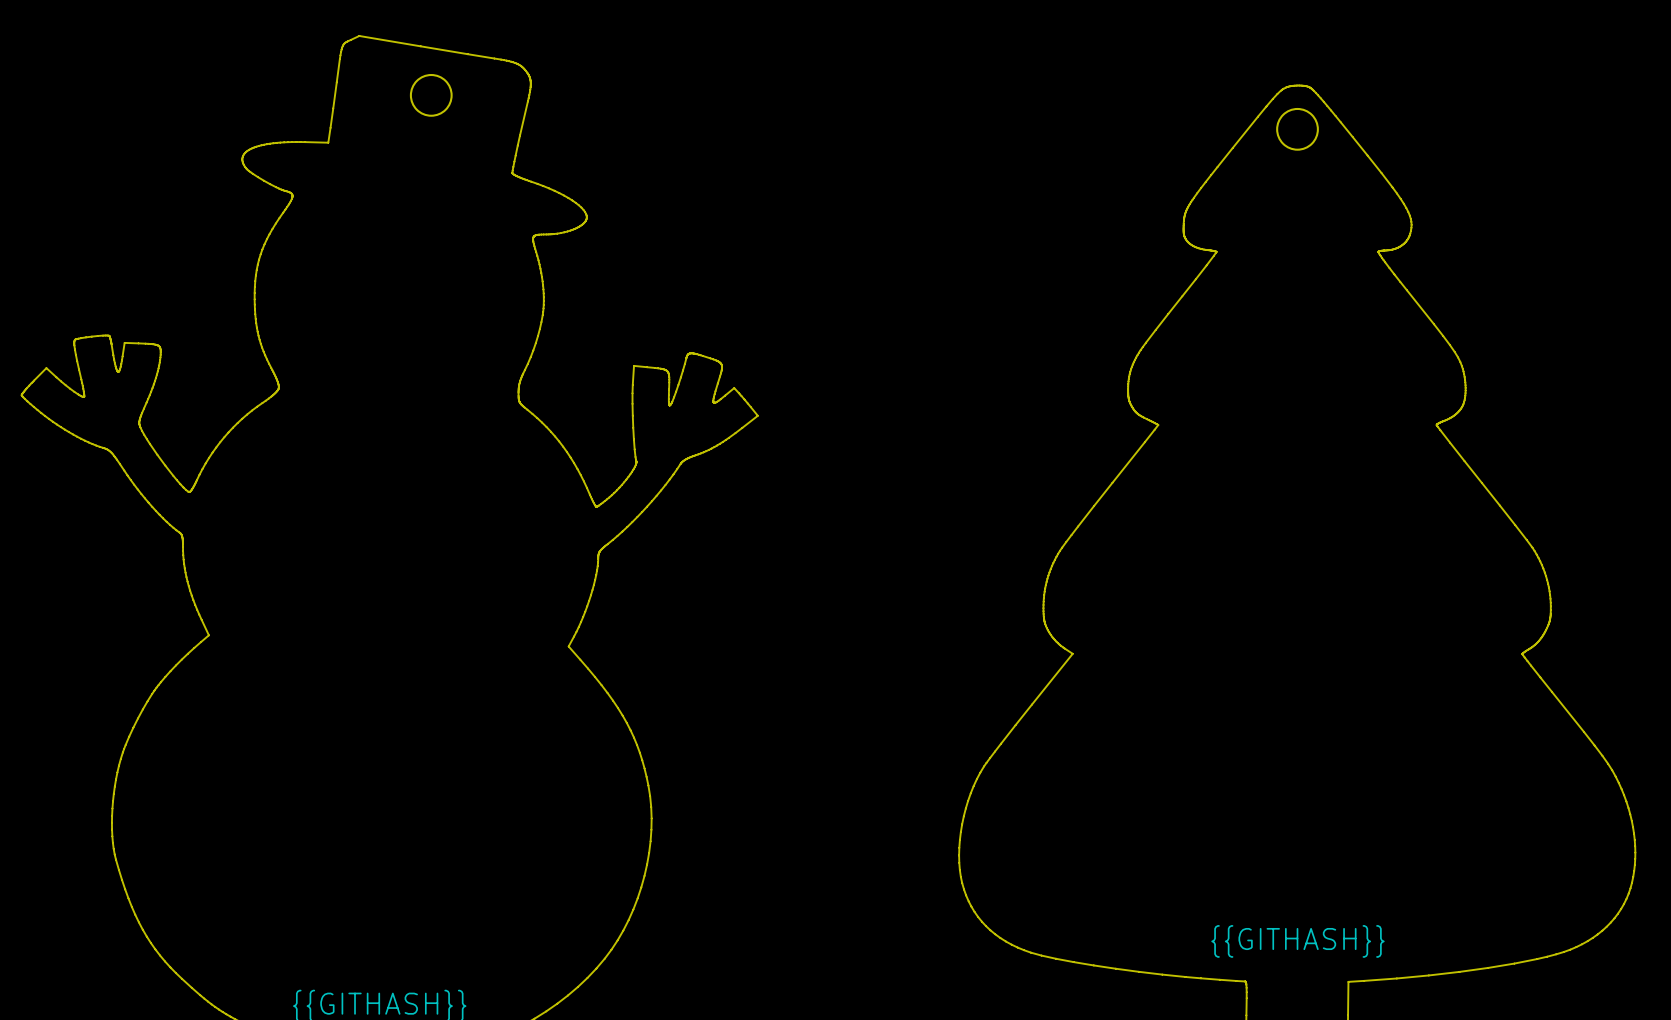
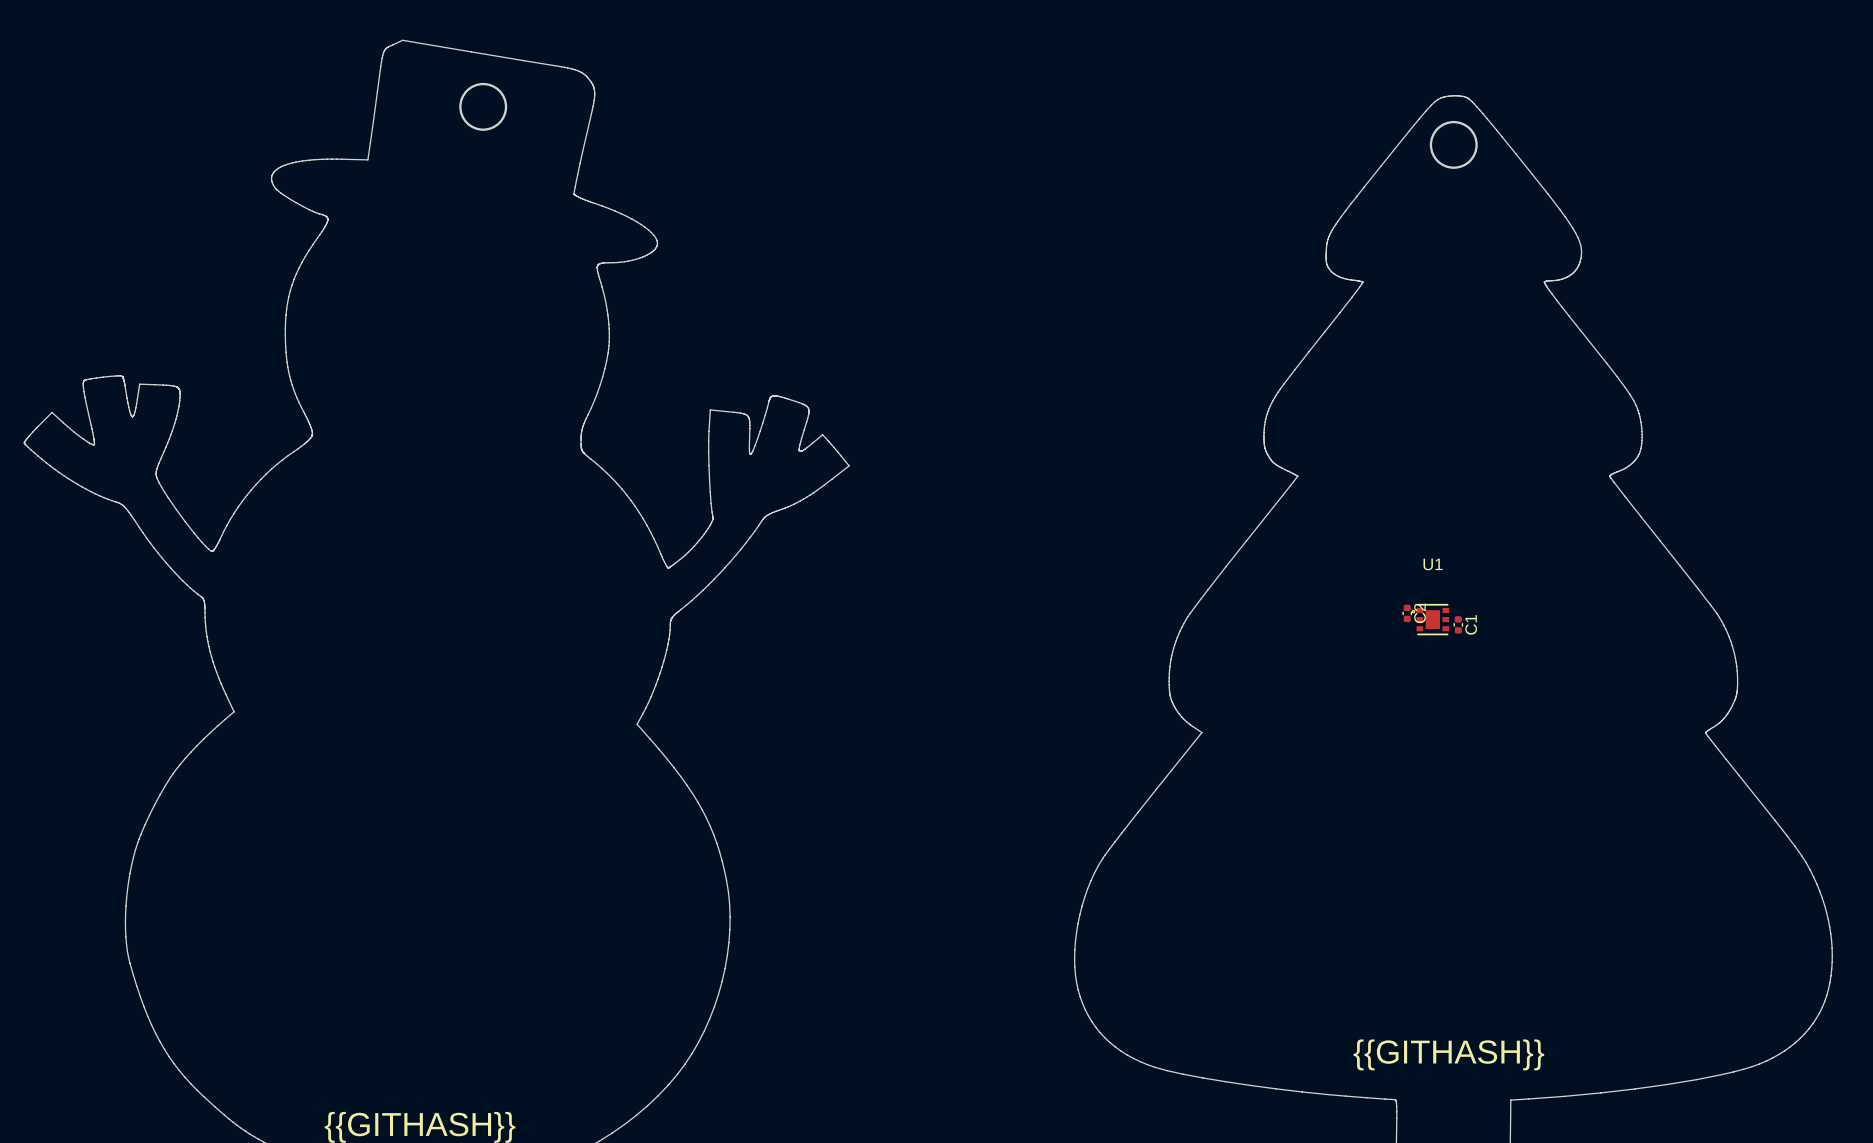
C2: none -> (1407, 613)
U1: none -> (1430, 619)
C1: none -> (1458, 624)

